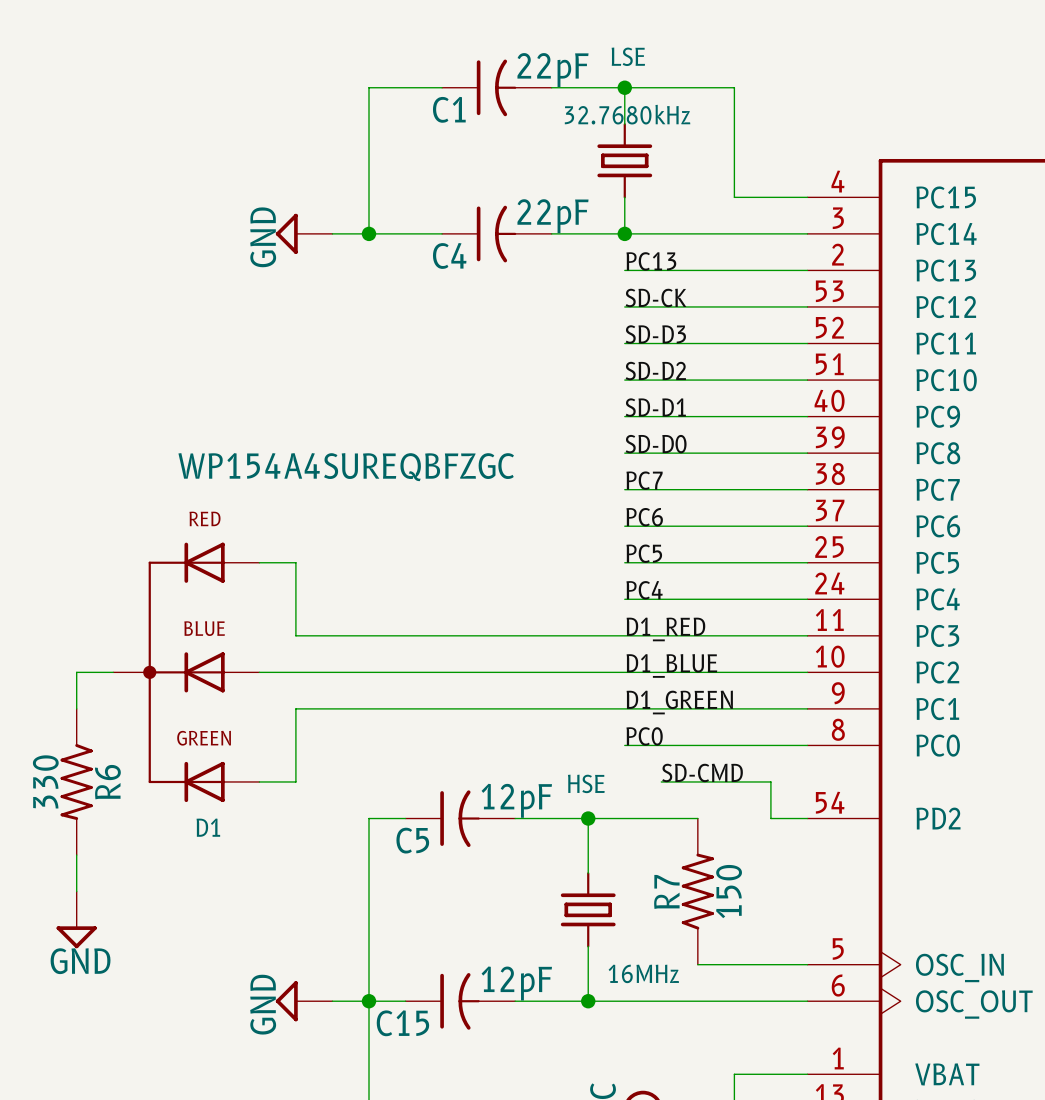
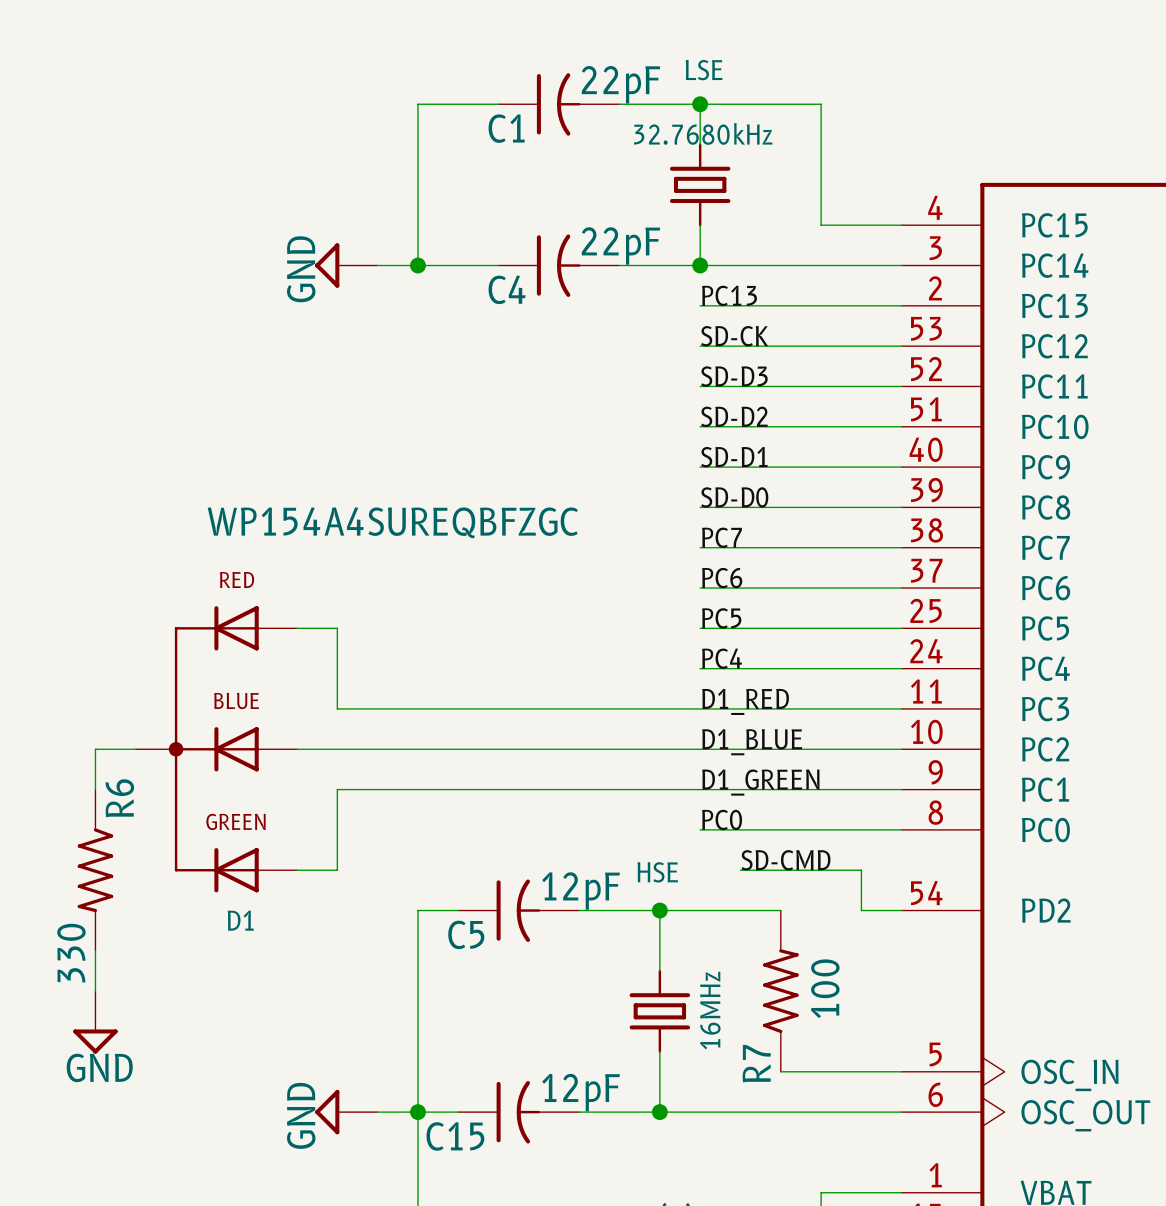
R6 value position: 330 (45, 781) -> 330 (71, 953)
R6 name position: R6 (107, 782) -> R6 (119, 798)
R7 name position: R7 (666, 891) -> R7 (756, 1063)
R7 value: 150 (729, 891) -> 100 (825, 988)
HSE value rotation: 0° (643, 973) -> 90° counterclockwise (710, 1010)

